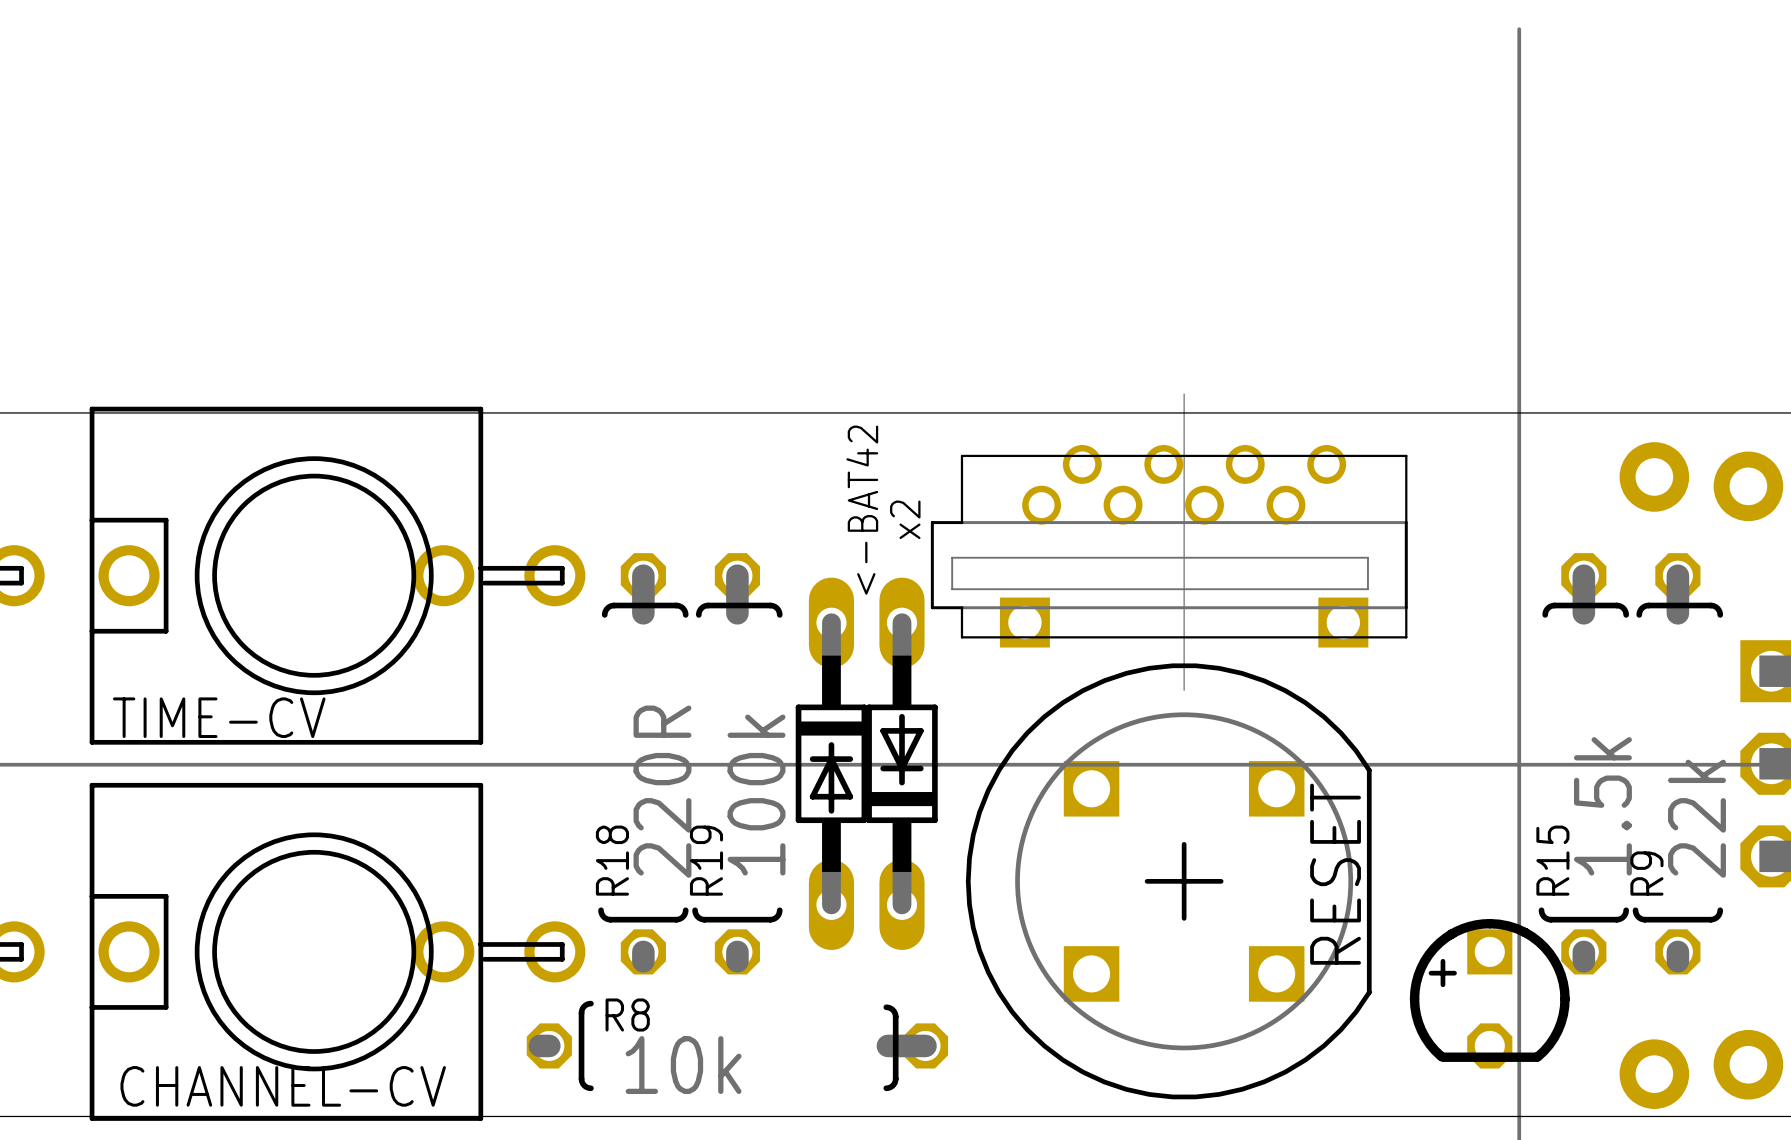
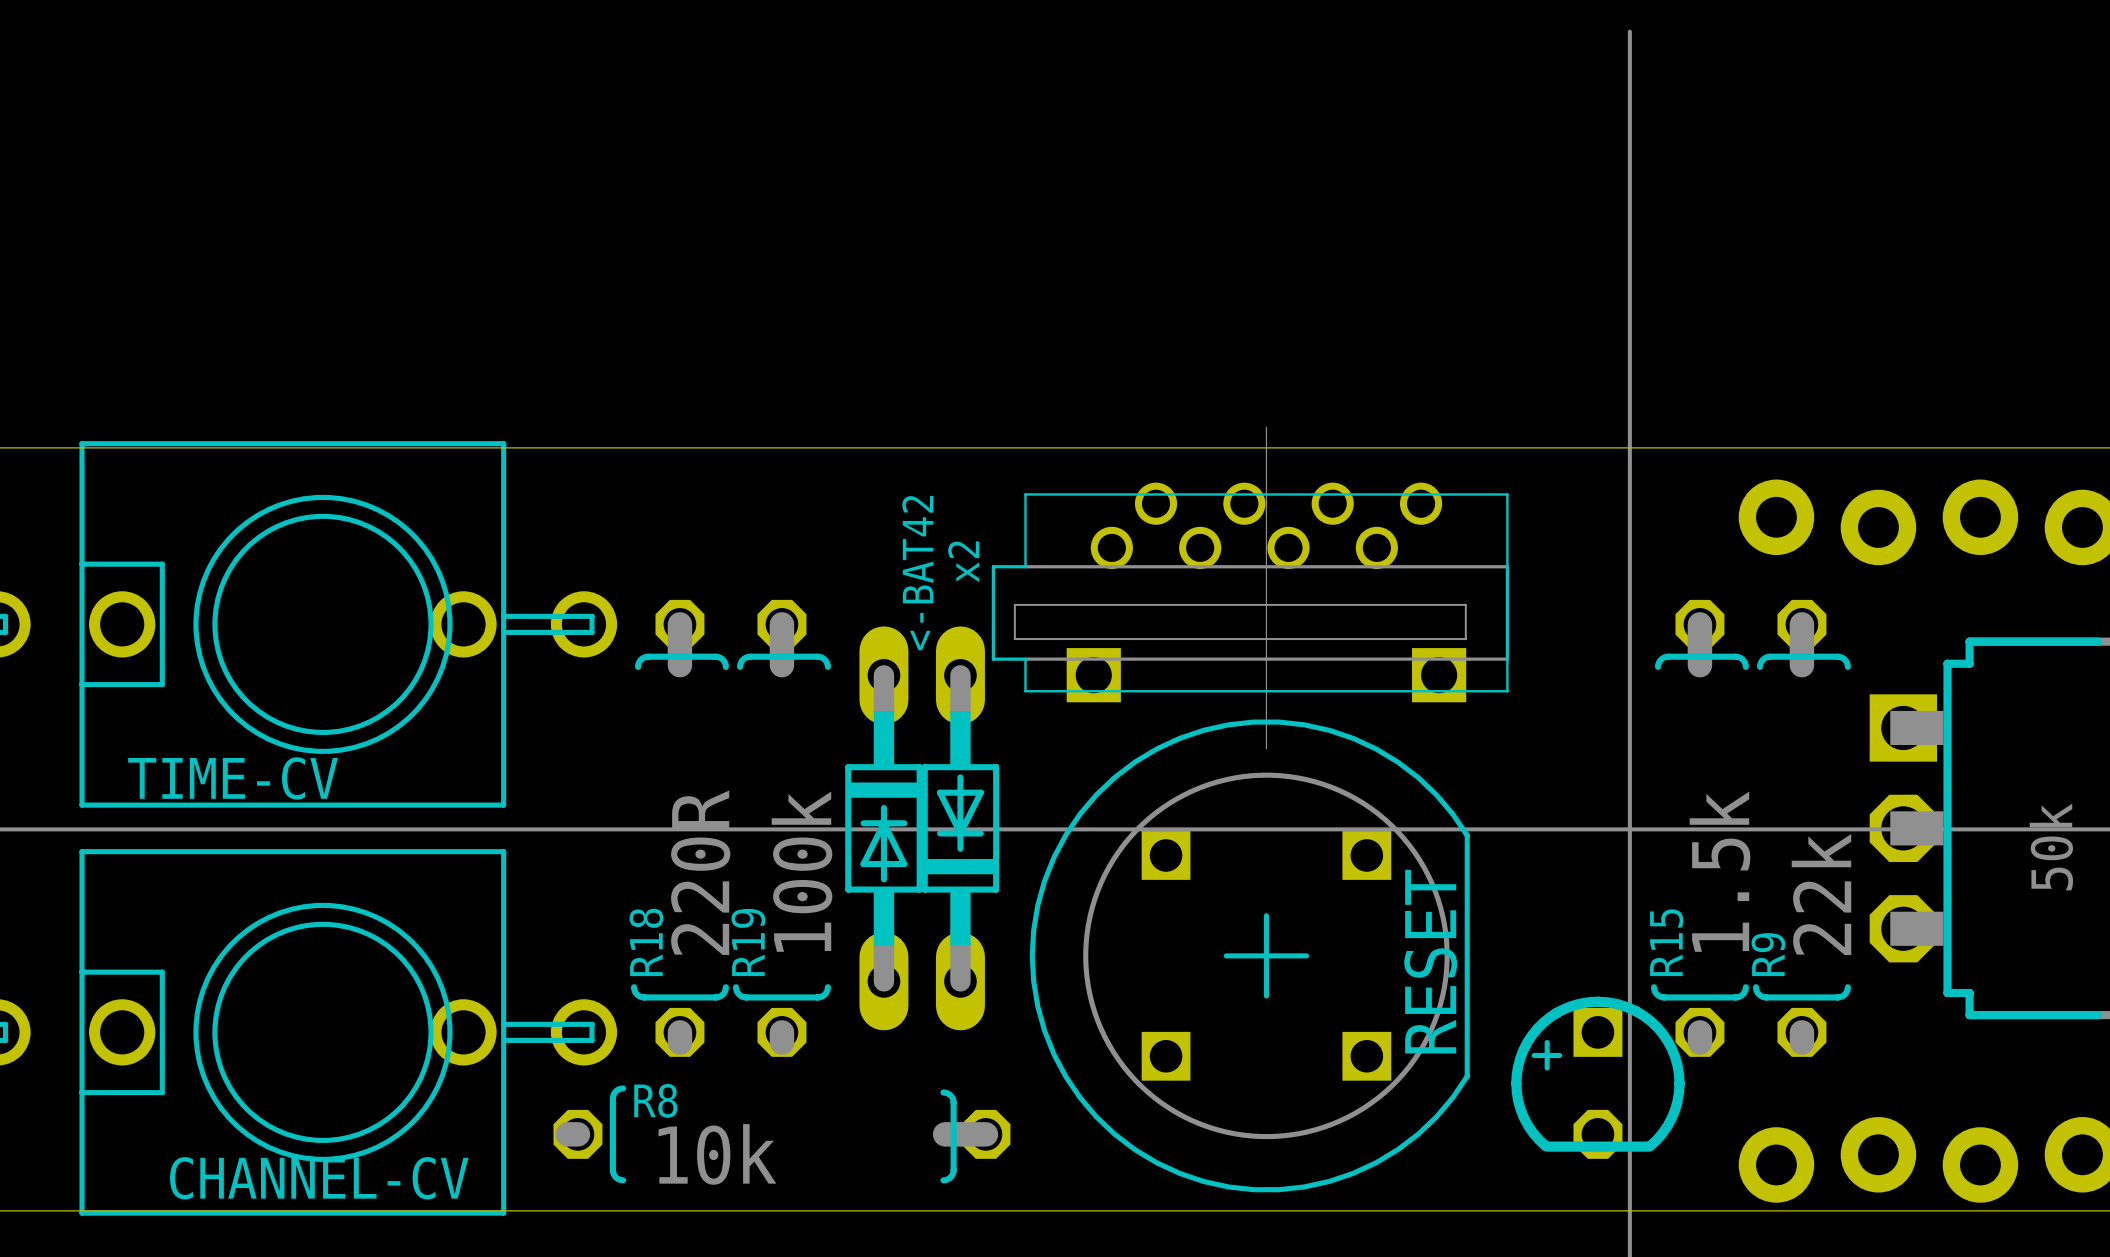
RESET footprint: [965, 663, 1372, 1100] -> [1029, 719, 1470, 1193]

